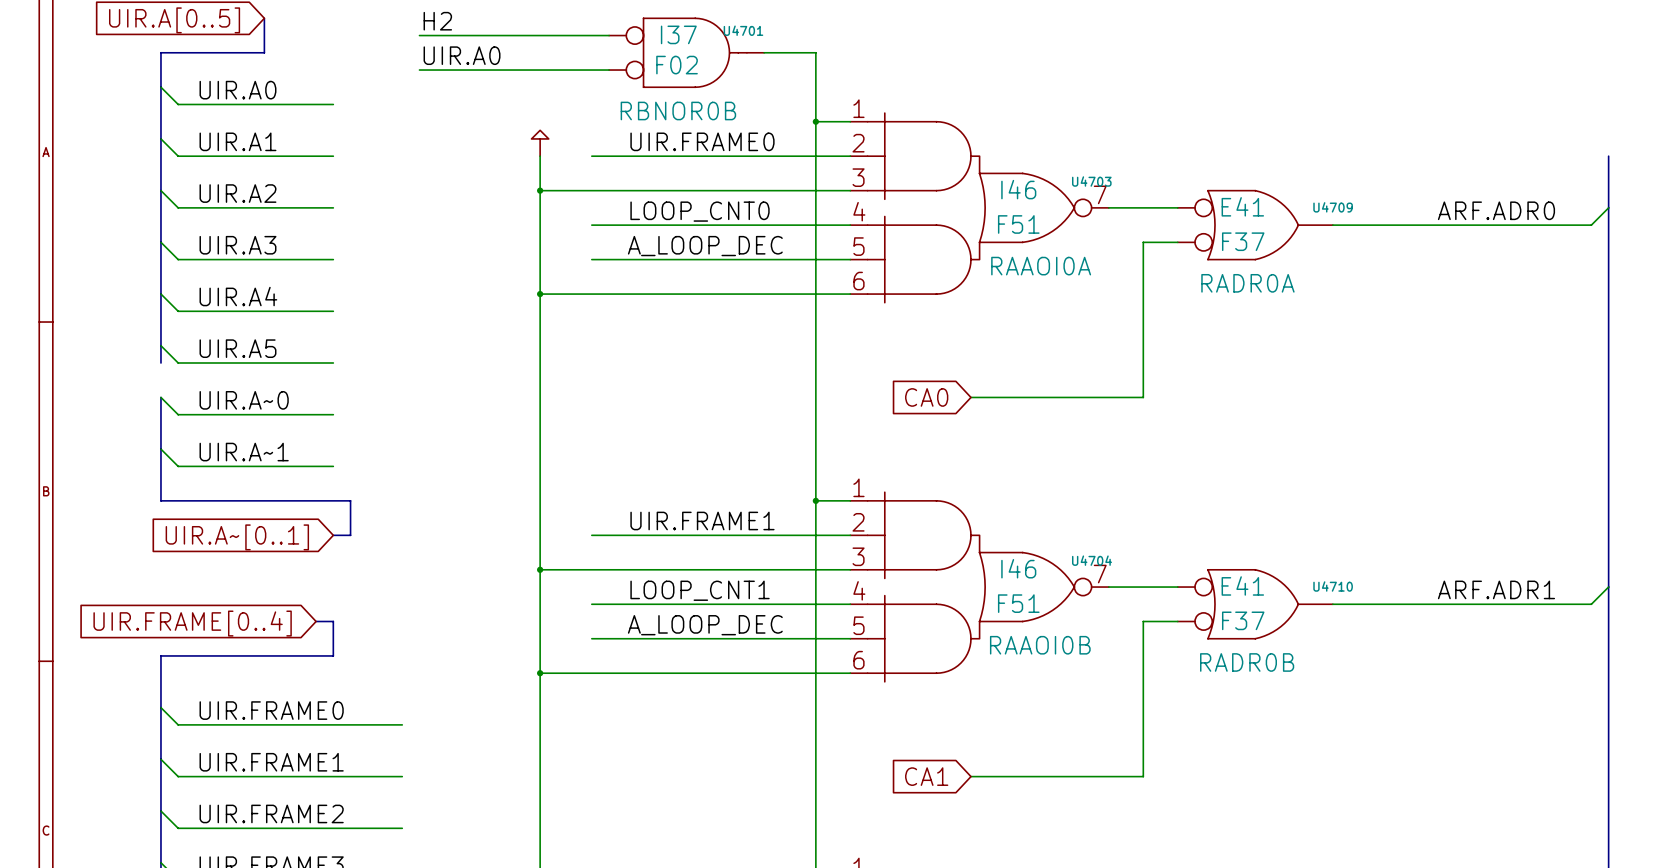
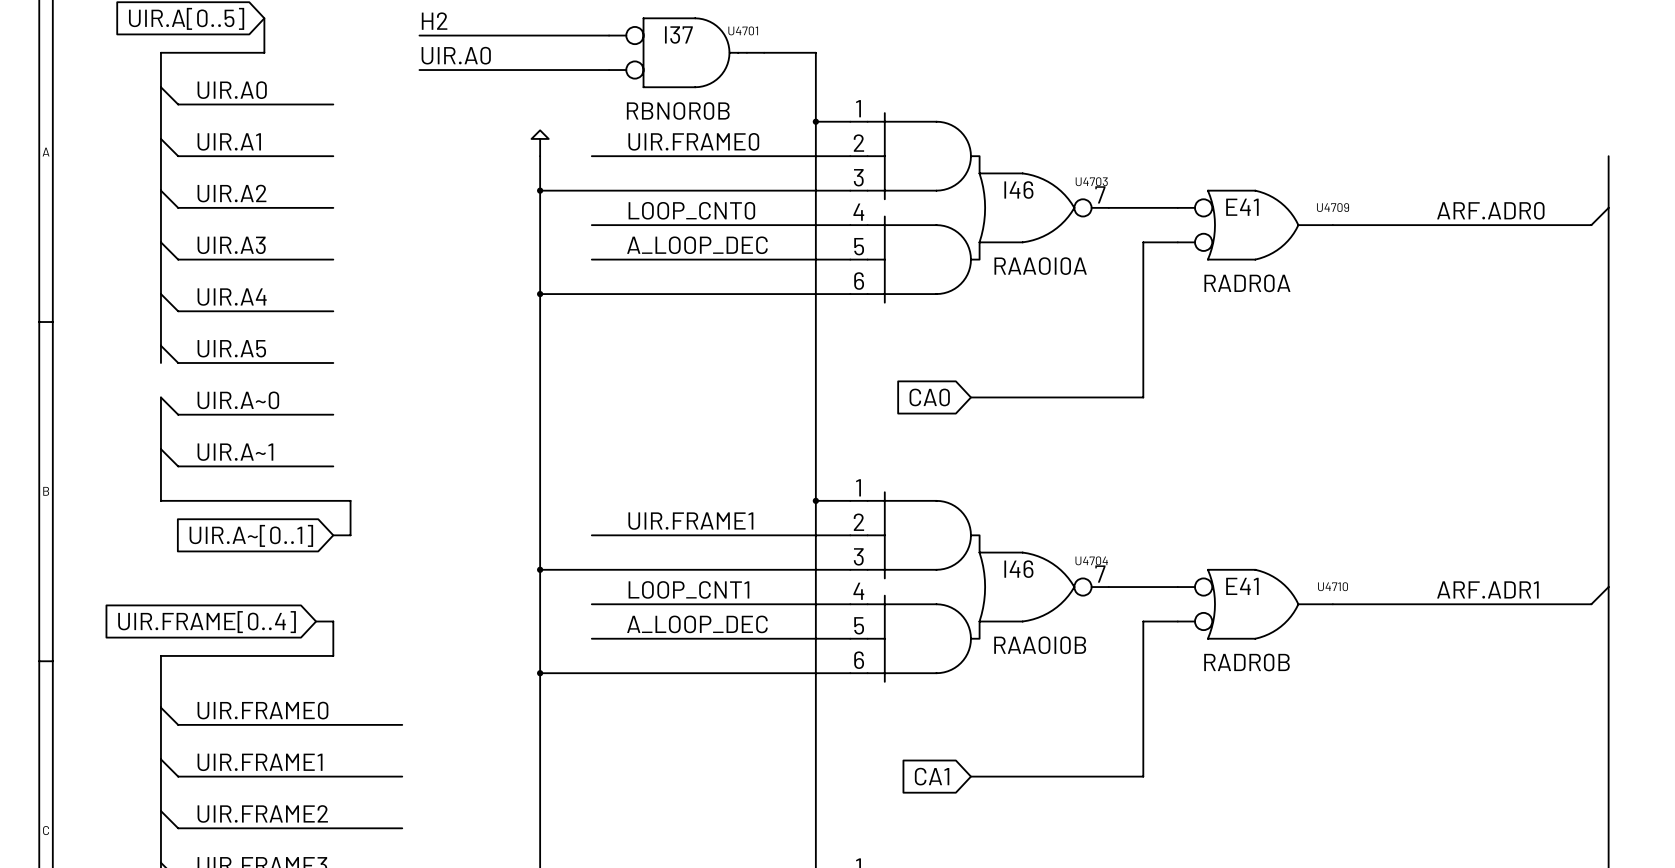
U4701 value: F02 (677, 65) -> none
U4703 value: F51 (1018, 224) -> none
U4709 value: F37 (1243, 241) -> none
U4704 value: F51 (1018, 603) -> none
U4710 value: F37 (1243, 620) -> none

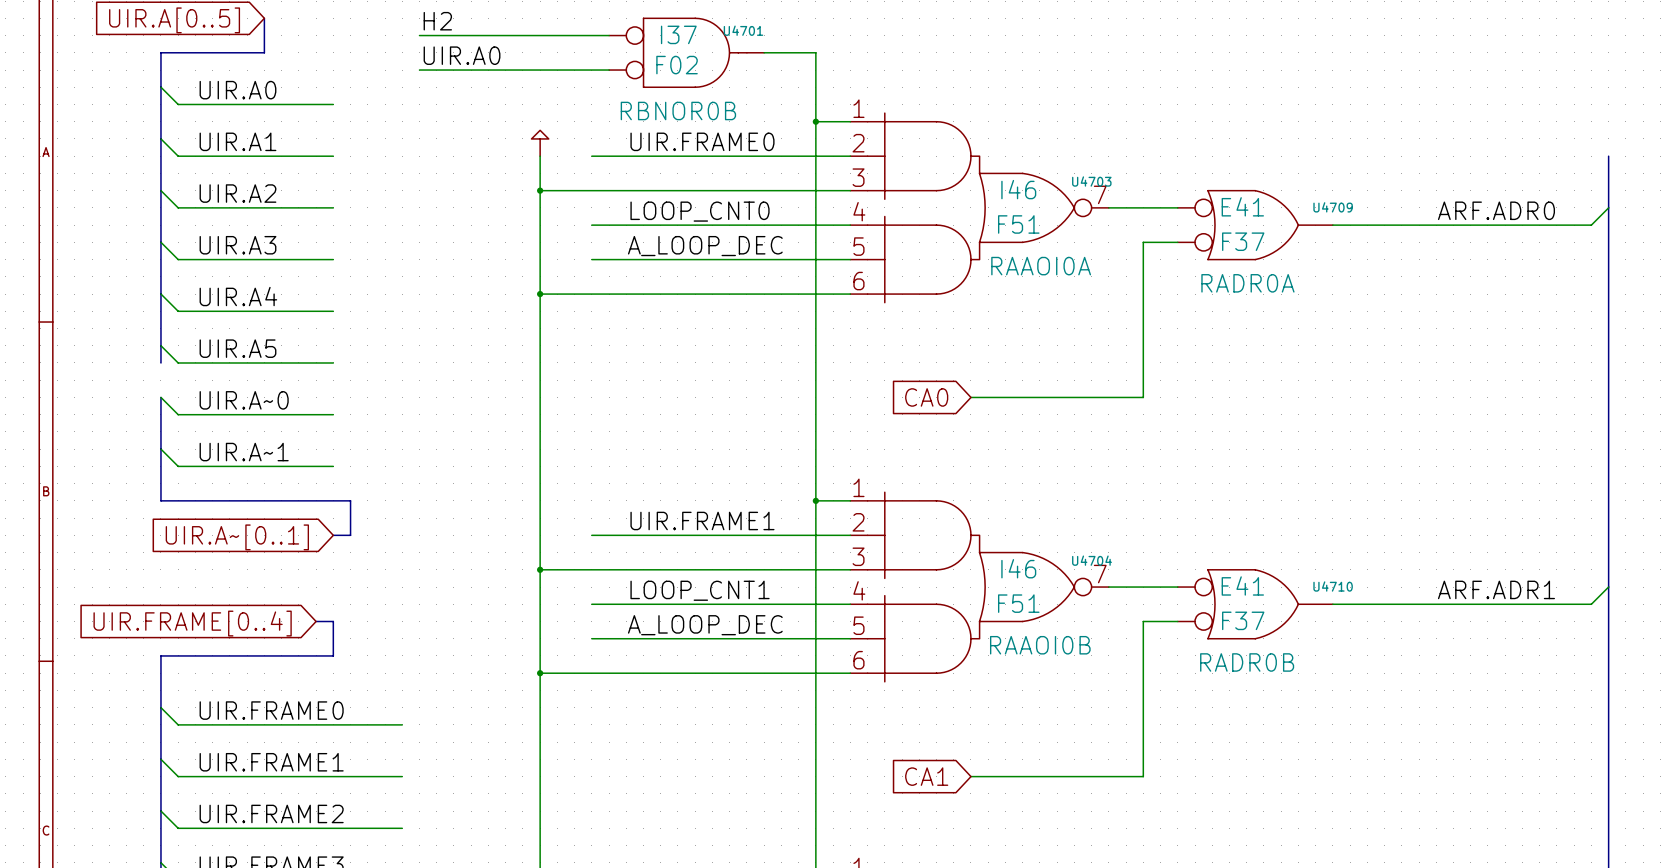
U4701 value: none -> F02 (677, 65)
U4703 value: none -> F51 (1018, 224)
U4709 value: none -> F37 (1243, 241)
U4704 value: none -> F51 (1018, 603)
U4710 value: none -> F37 (1243, 620)

